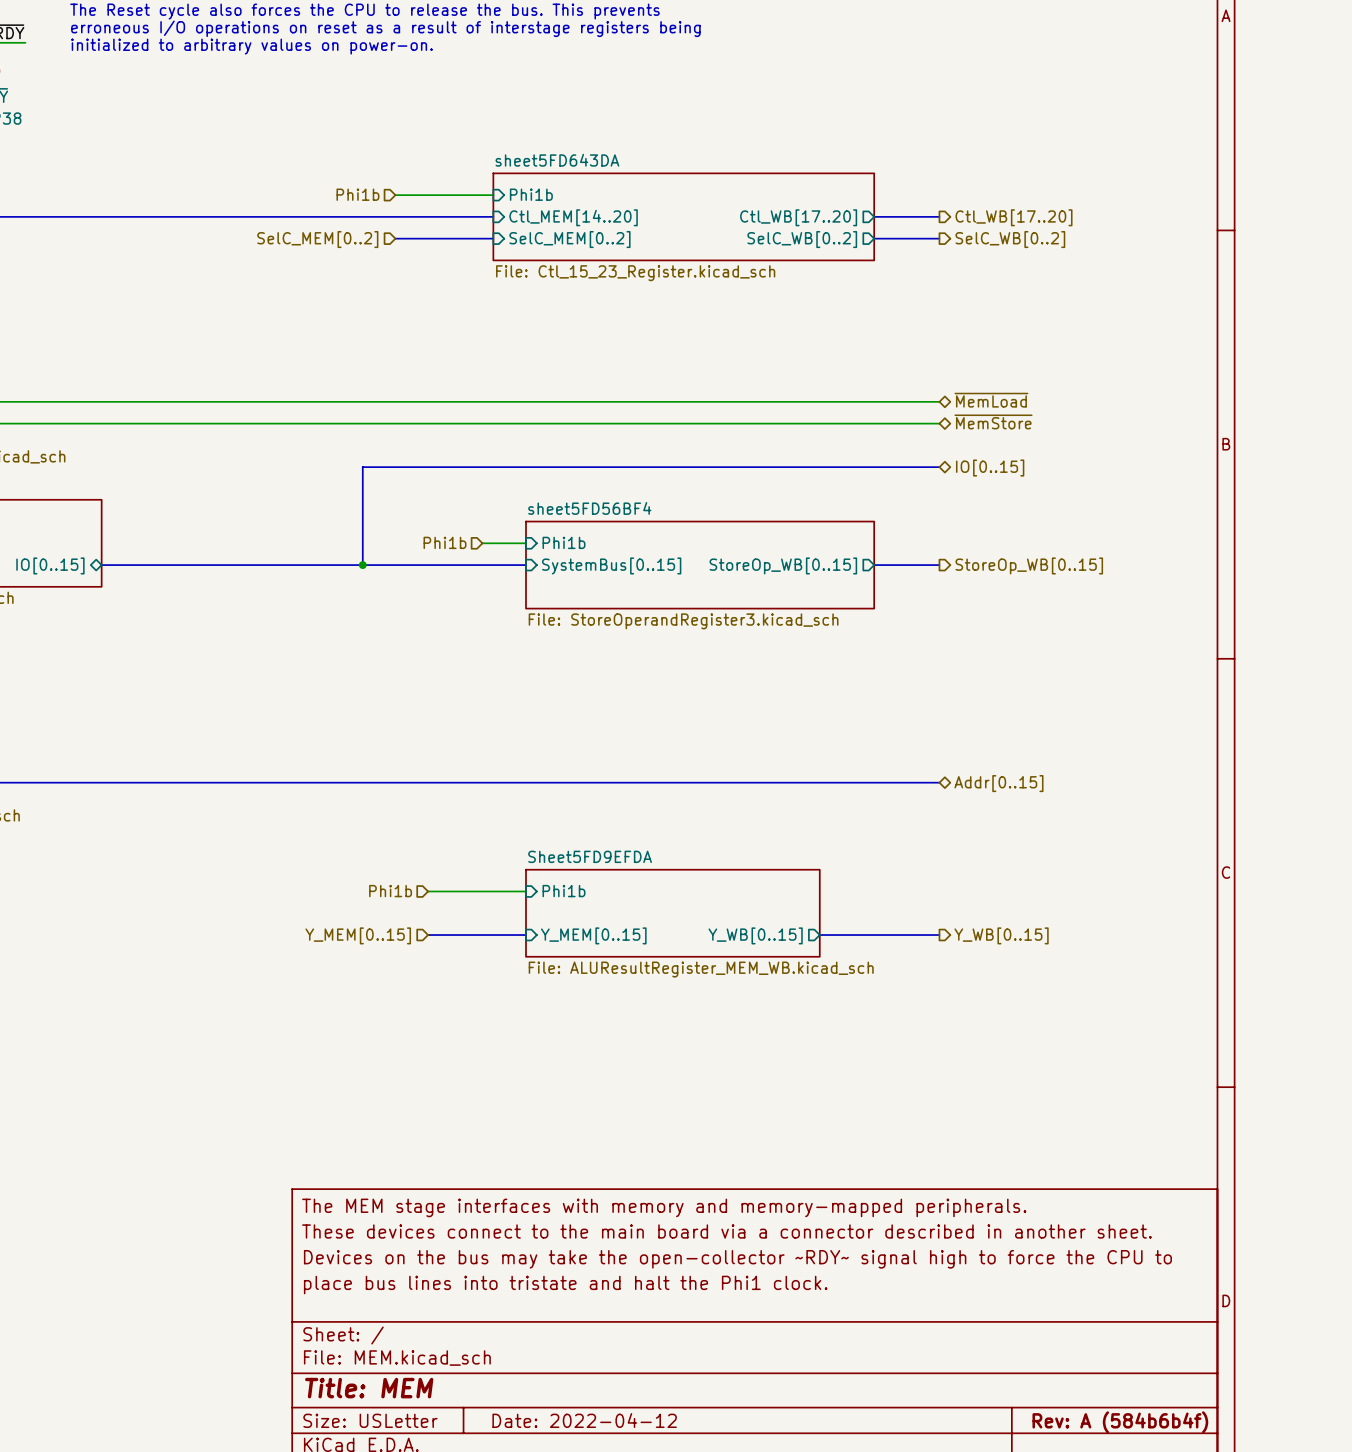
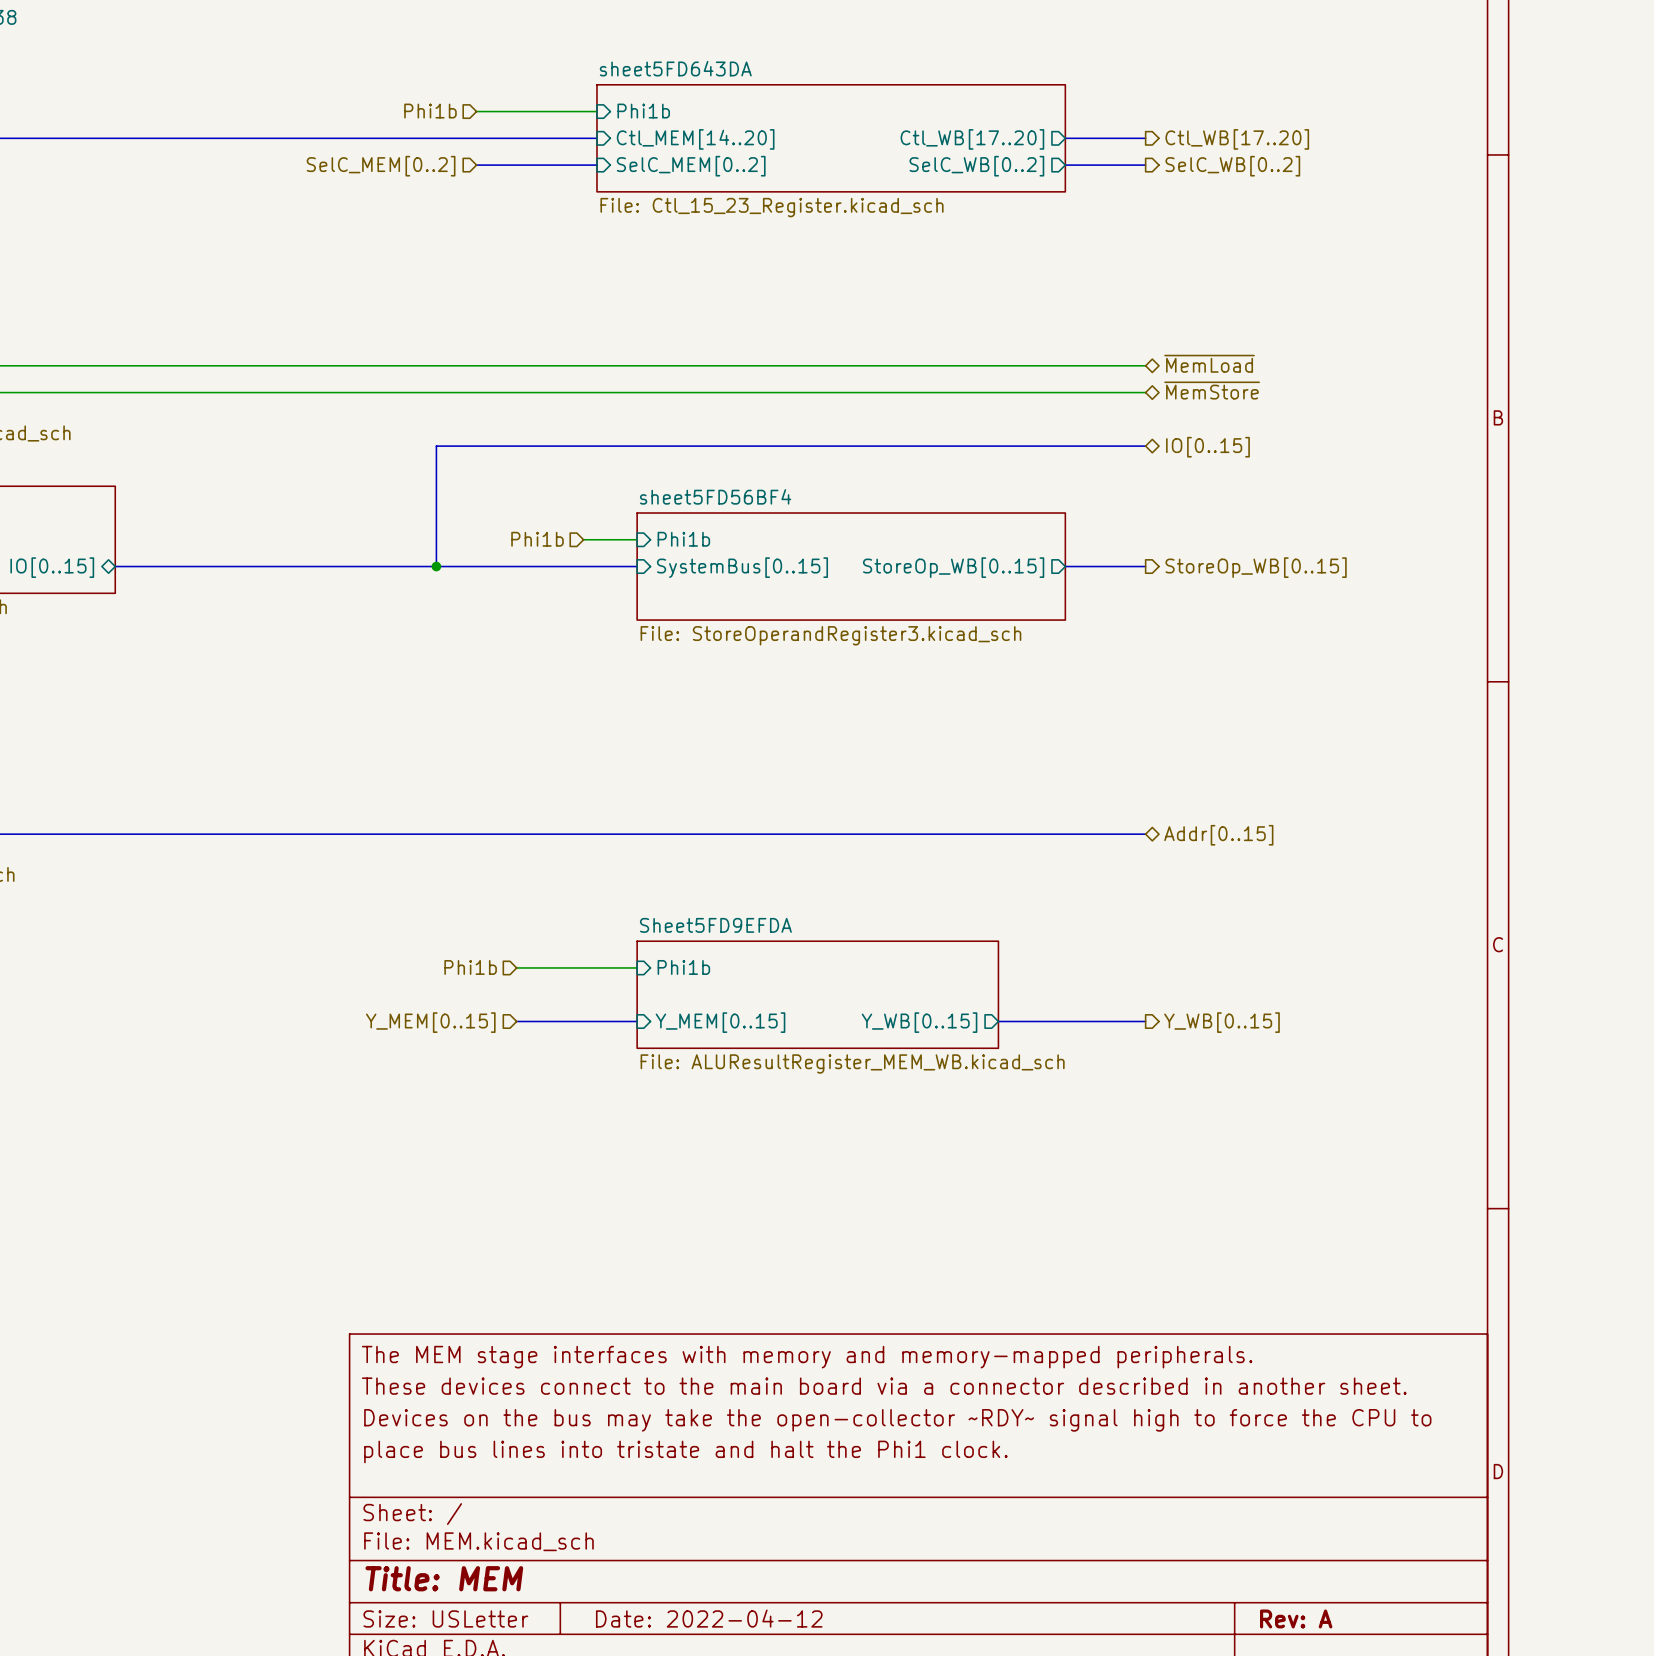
title block: Rev: A (584b6b4f) (1120, 1422) -> Rev: A (1296, 1618)

